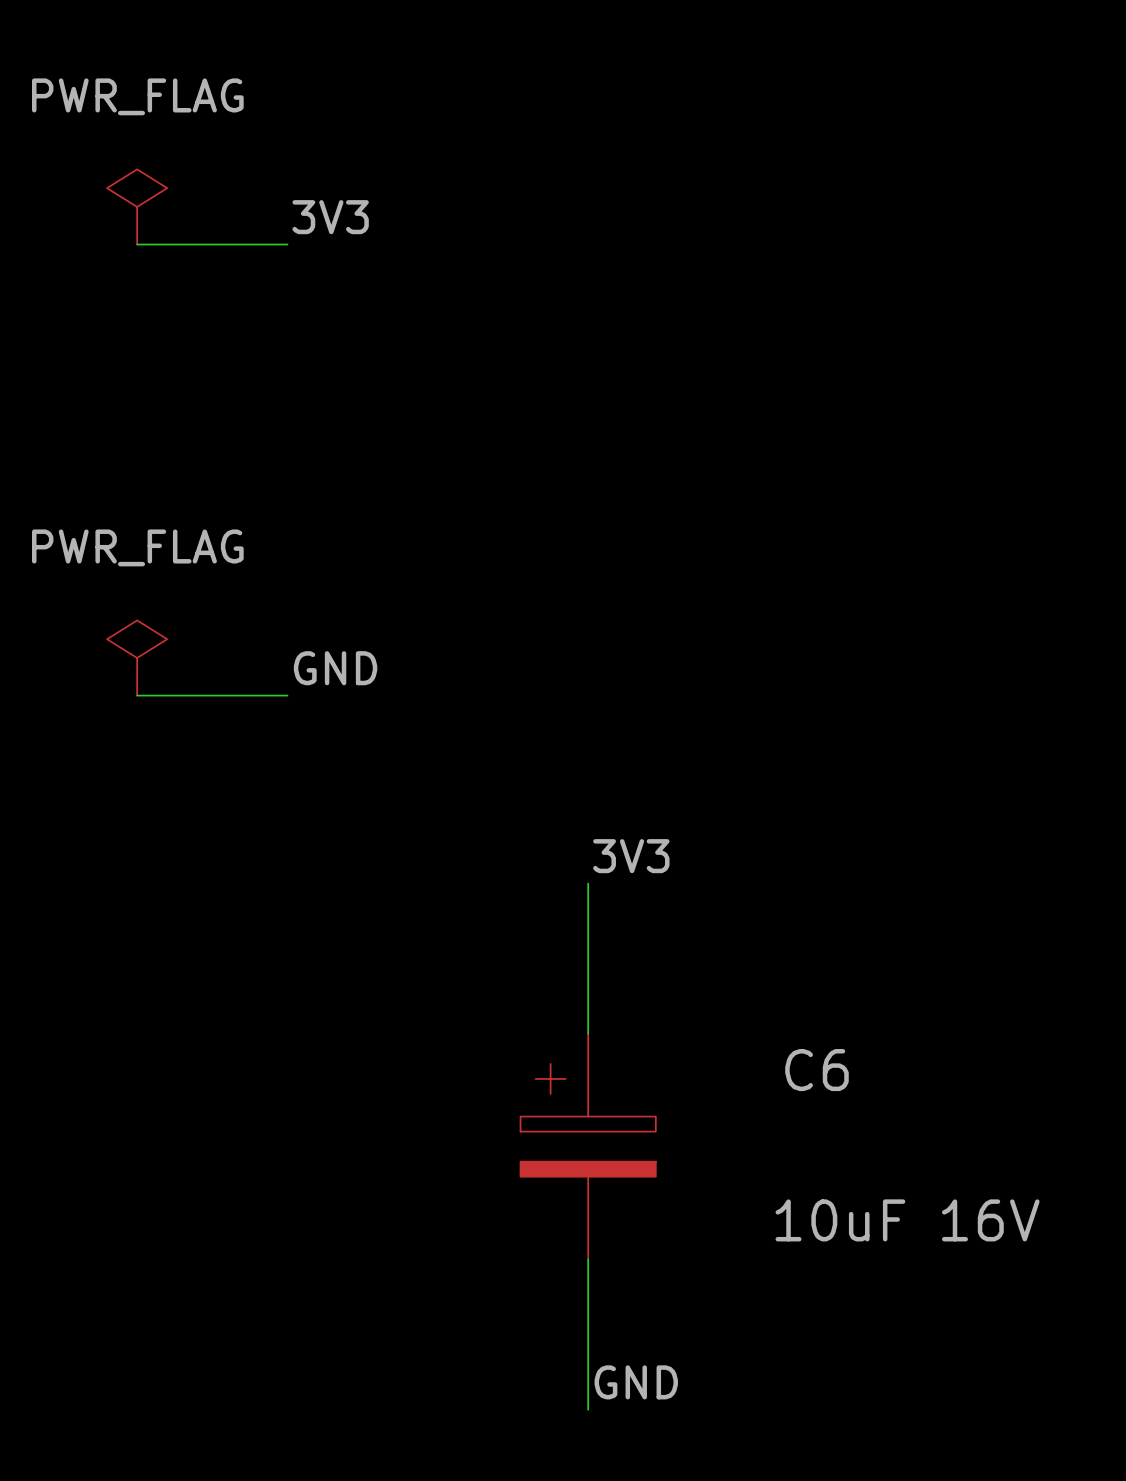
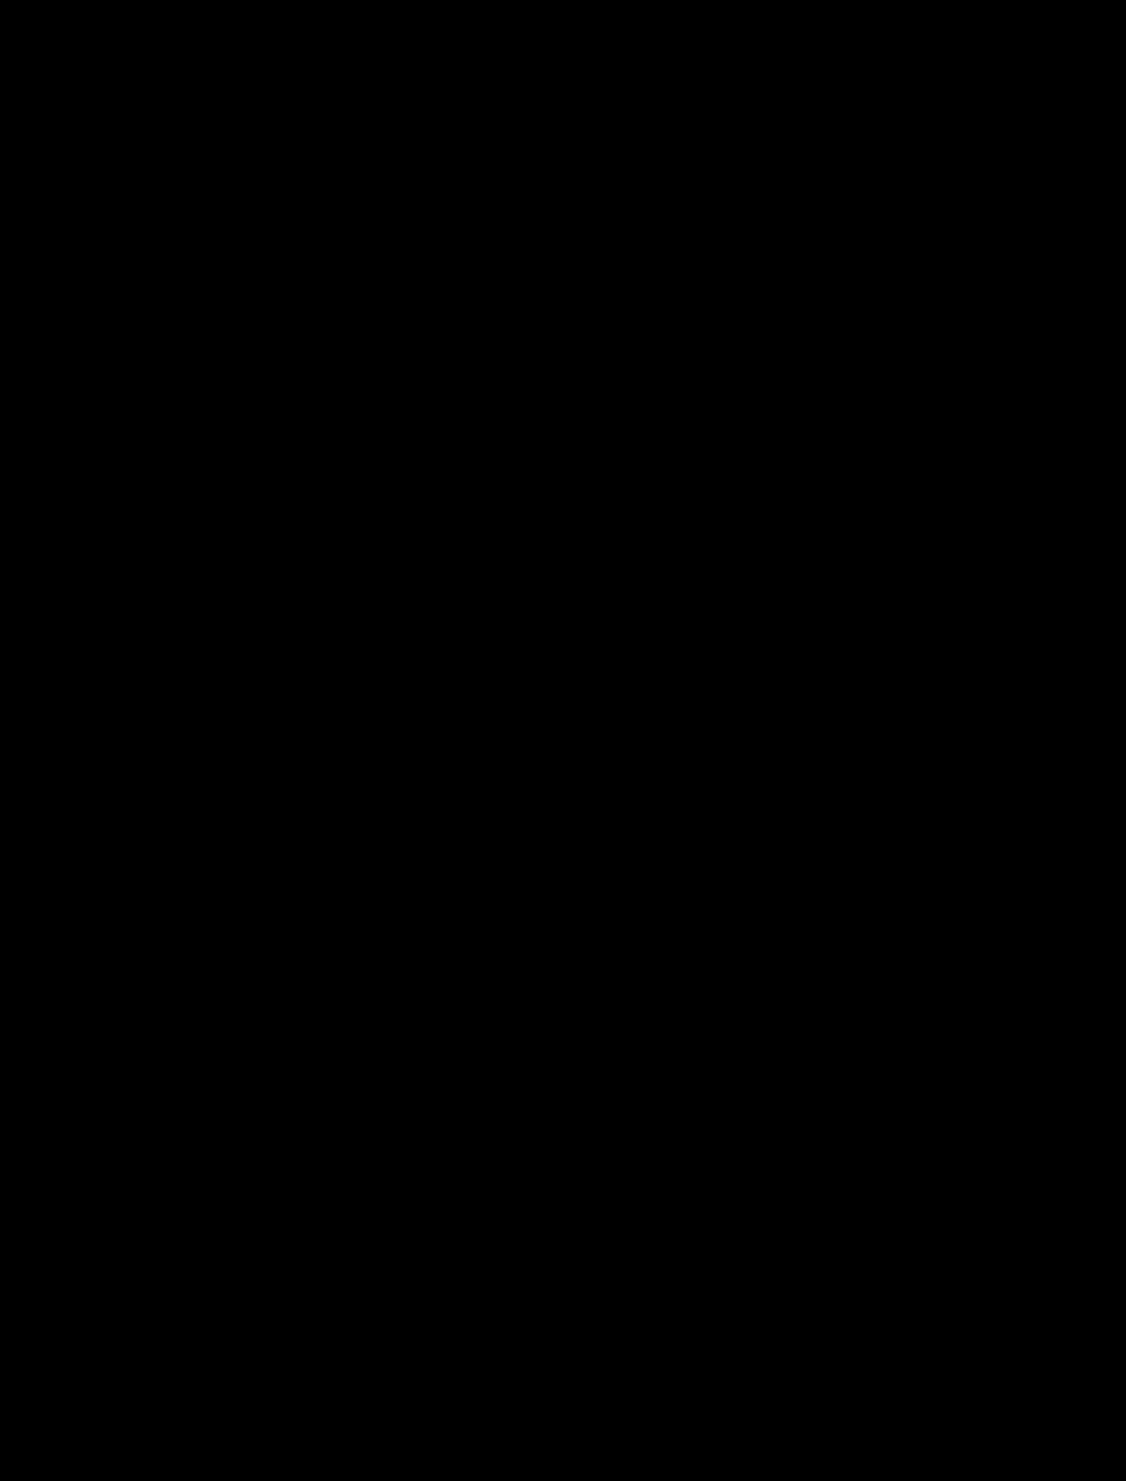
power symbol: PWR_FLAG (137, 206) -> none
label: 3V3 (330, 217) -> none
wire: (137, 244) (287, 244) -> none
power symbol: PWR_FLAG (137, 657) -> none
label: GND (335, 668) -> none
wire: (137, 695) (287, 695) -> none
label: 3V3 (631, 856) -> none
wire: (588, 883) (588, 1033) -> none
C6: 10uF 16V (588, 1146) -> none
wire: (588, 1259) (588, 1409) -> none
label: GND (636, 1382) -> none

